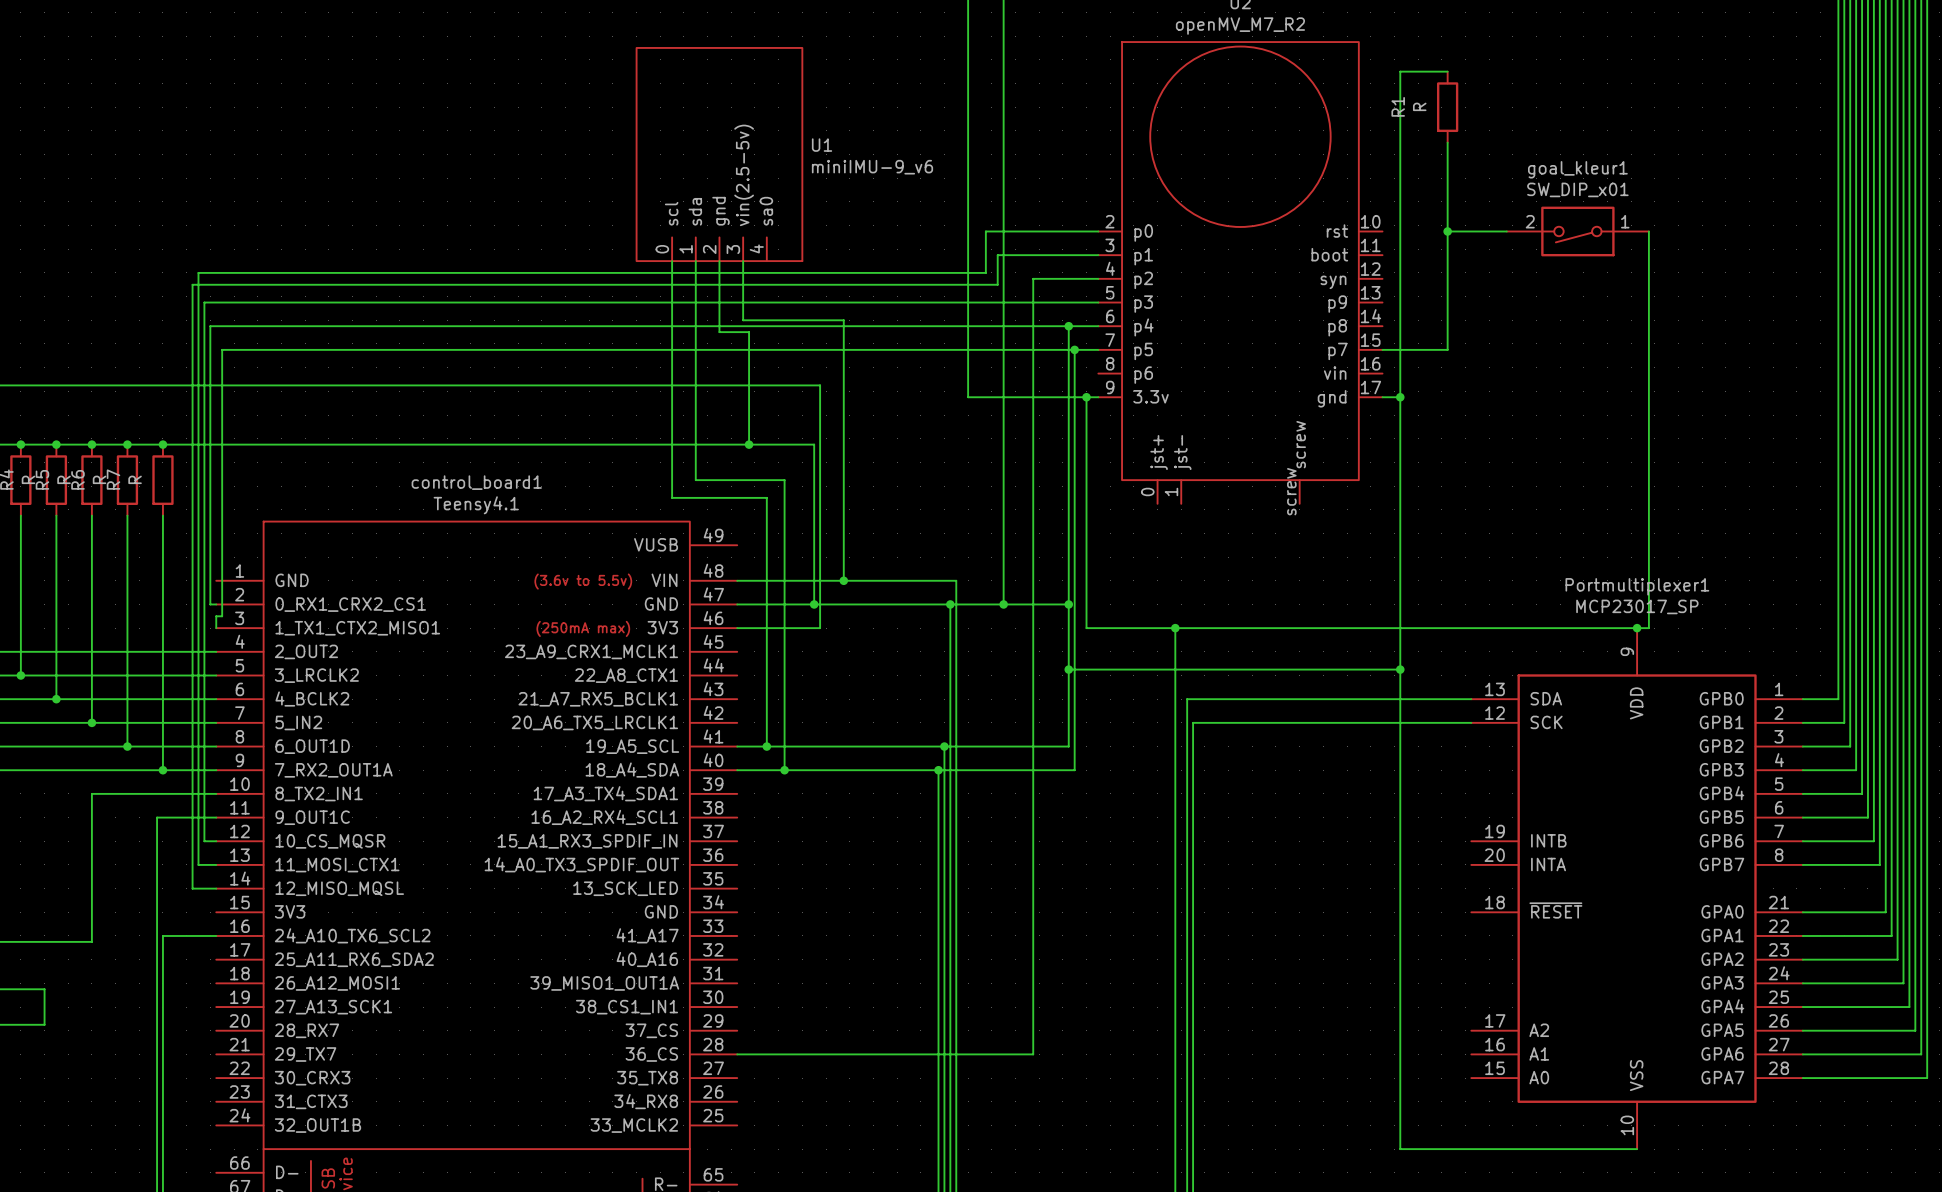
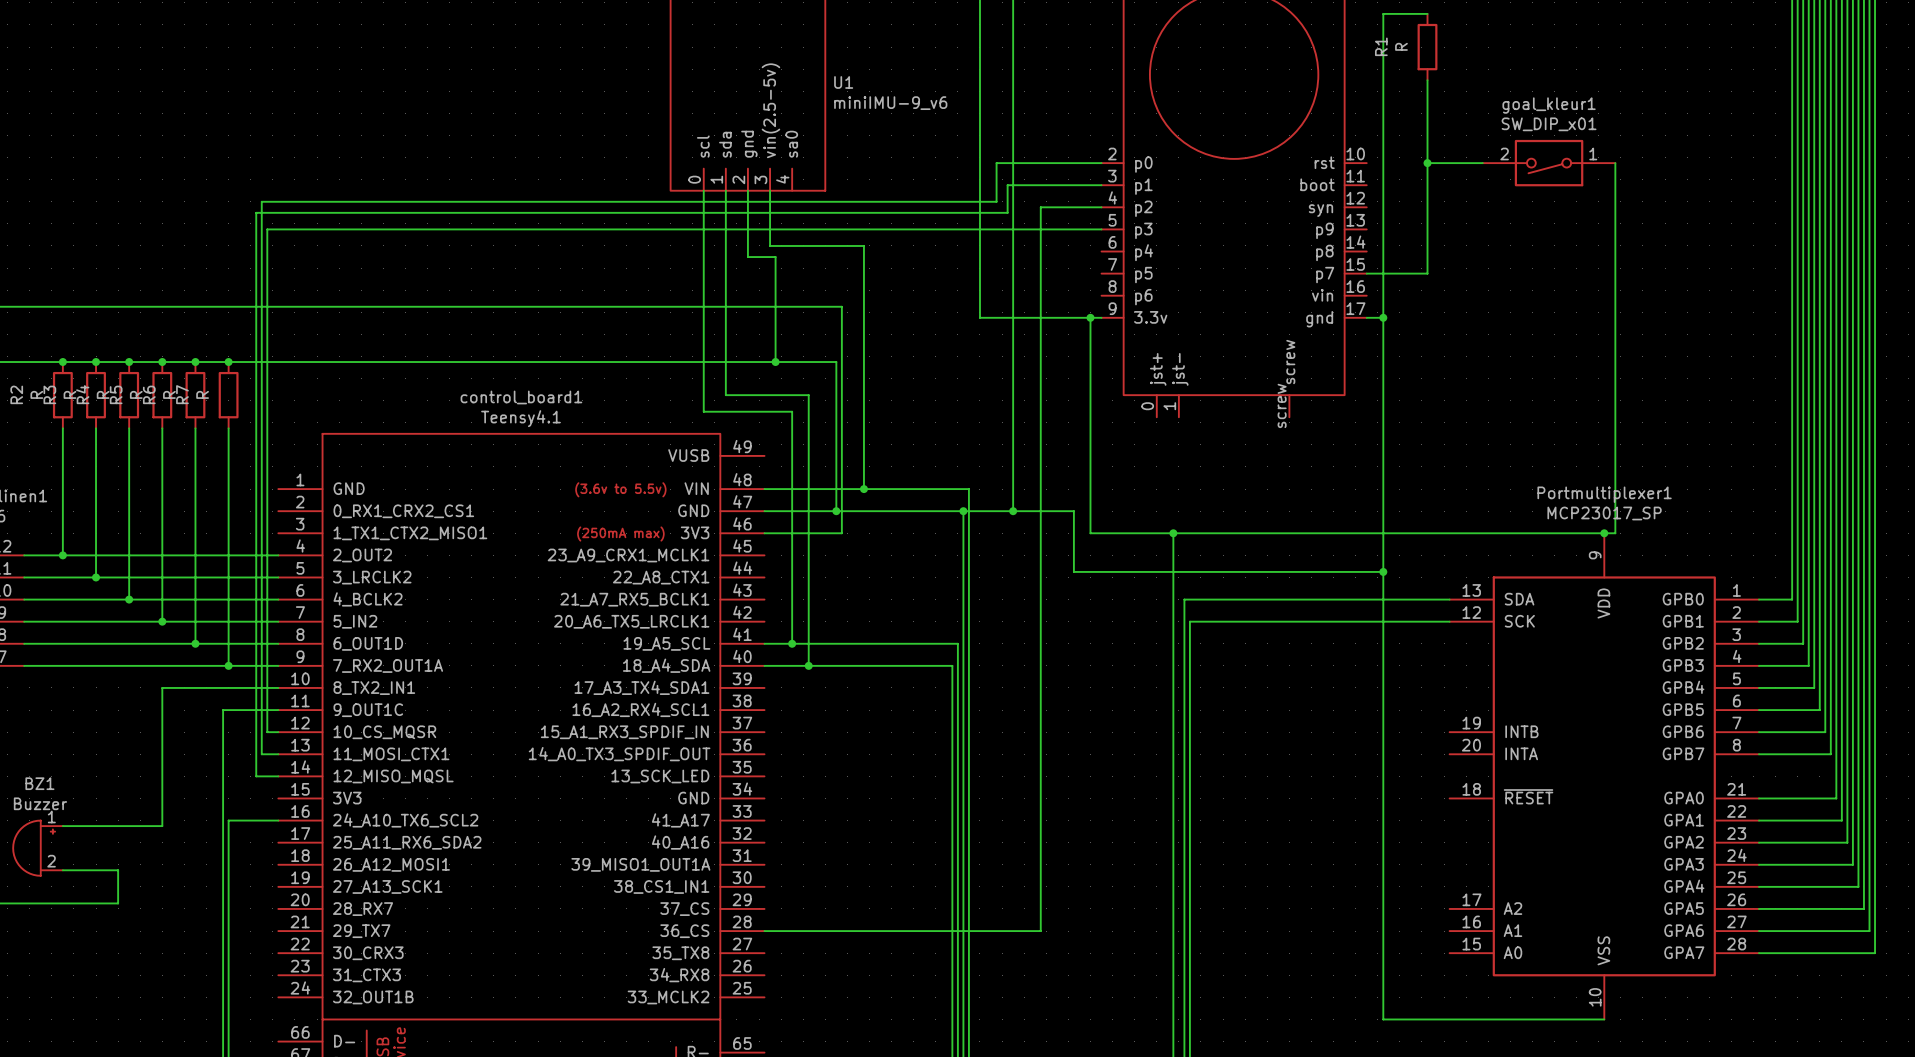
wire: (1068, 326) (1068, 604) -> none
junction: (1068, 326) -> none
wire: (1098, 326) (210, 326) (210, 604) (216, 604) -> none
wire: (1074, 349) (1074, 770) (938, 770) -> none
junction: (1074, 349) -> none
wire: (1098, 349) (222, 349) (222, 616) (216, 616) (216, 628) -> none
junction: (1068, 604) -> none
wire: (1068, 669) (1068, 746) (944, 746) -> none
junction: (1068, 669) -> none
junction: (944, 746) -> none
junction: (938, 770) -> none

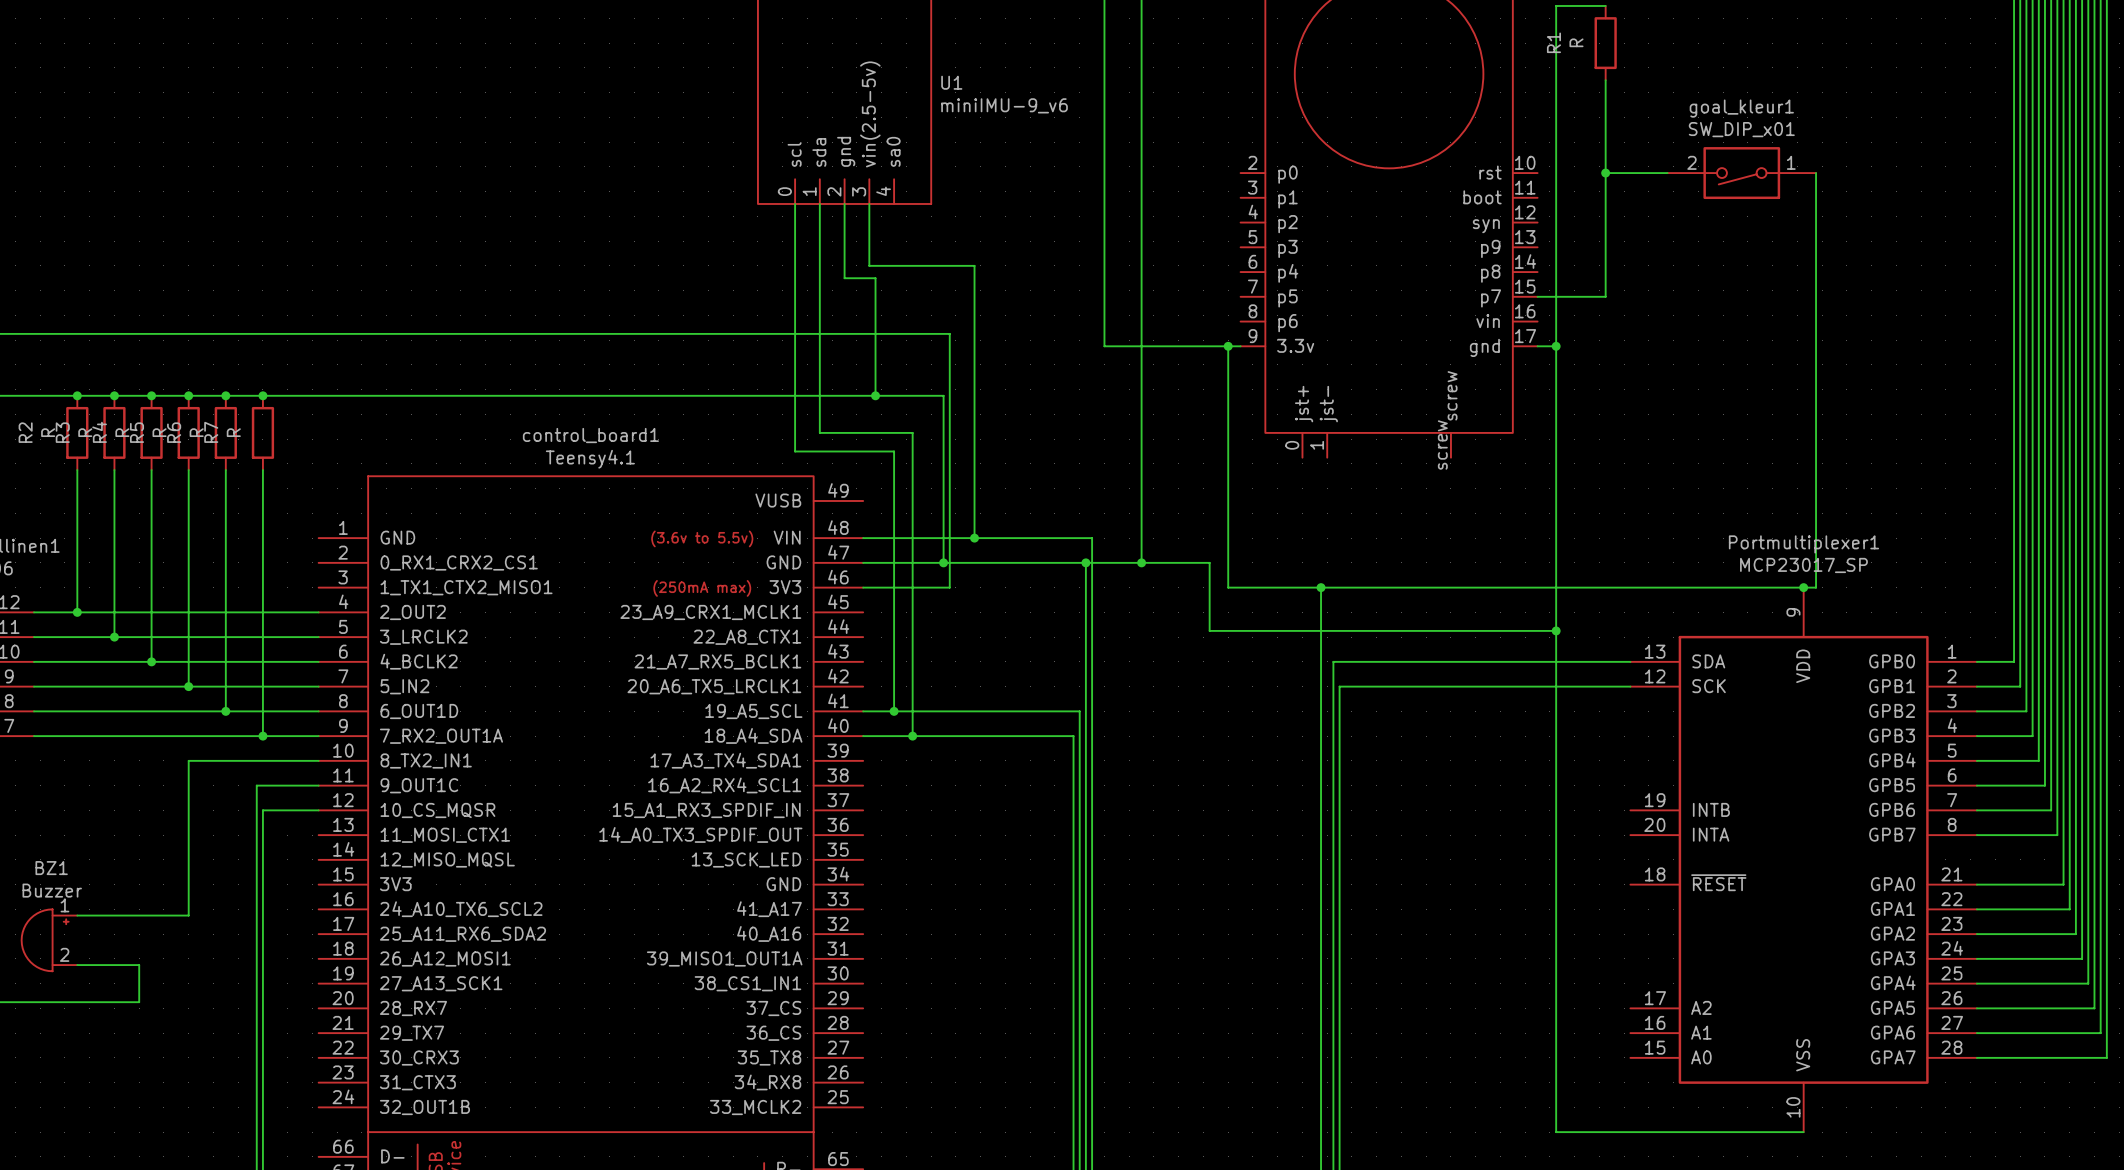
wire: (1101, 163) (996, 163) (996, 201) (261, 201) (261, 754) (278, 754) -> none
wire: (1101, 185) (1007, 185) (1007, 212) (256, 212) (256, 776) (278, 776) -> none
wire: (1101, 207) (1040, 207) (1040, 931) (764, 931) -> none
wire: (1101, 229) (267, 229) (267, 732) -> none
wire: (228, 820) (278, 820) -> (262, 909) (262, 810) (306, 810)

